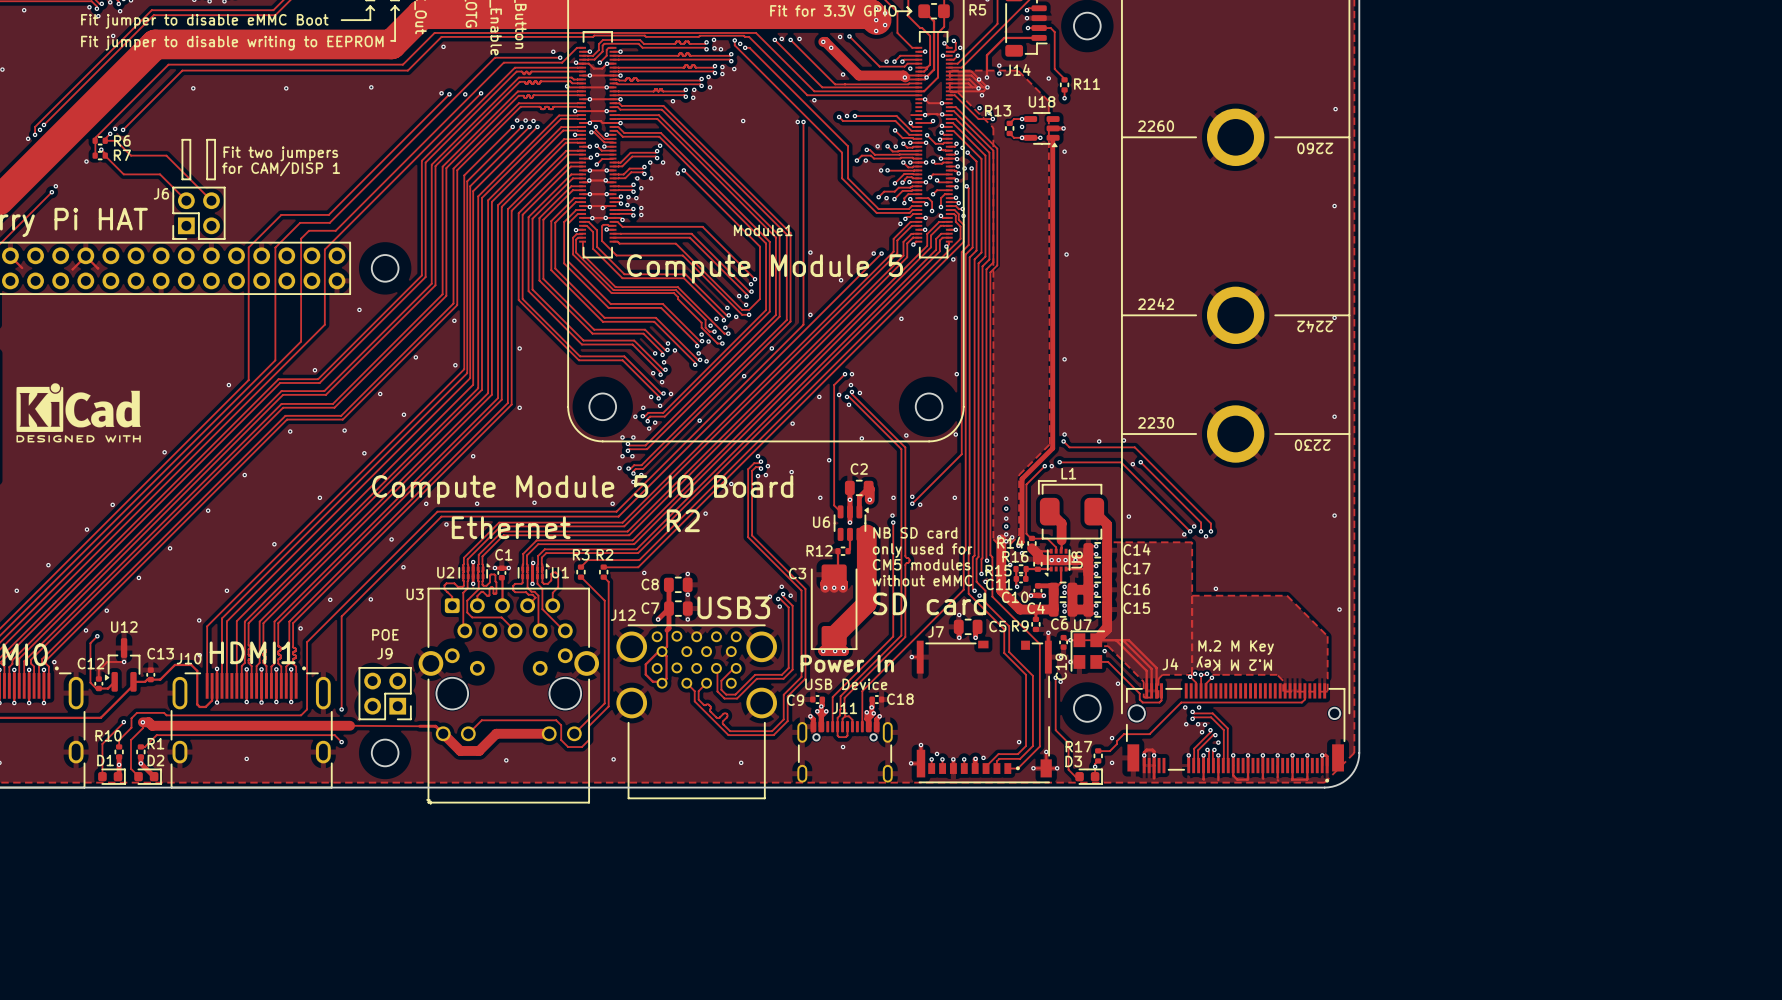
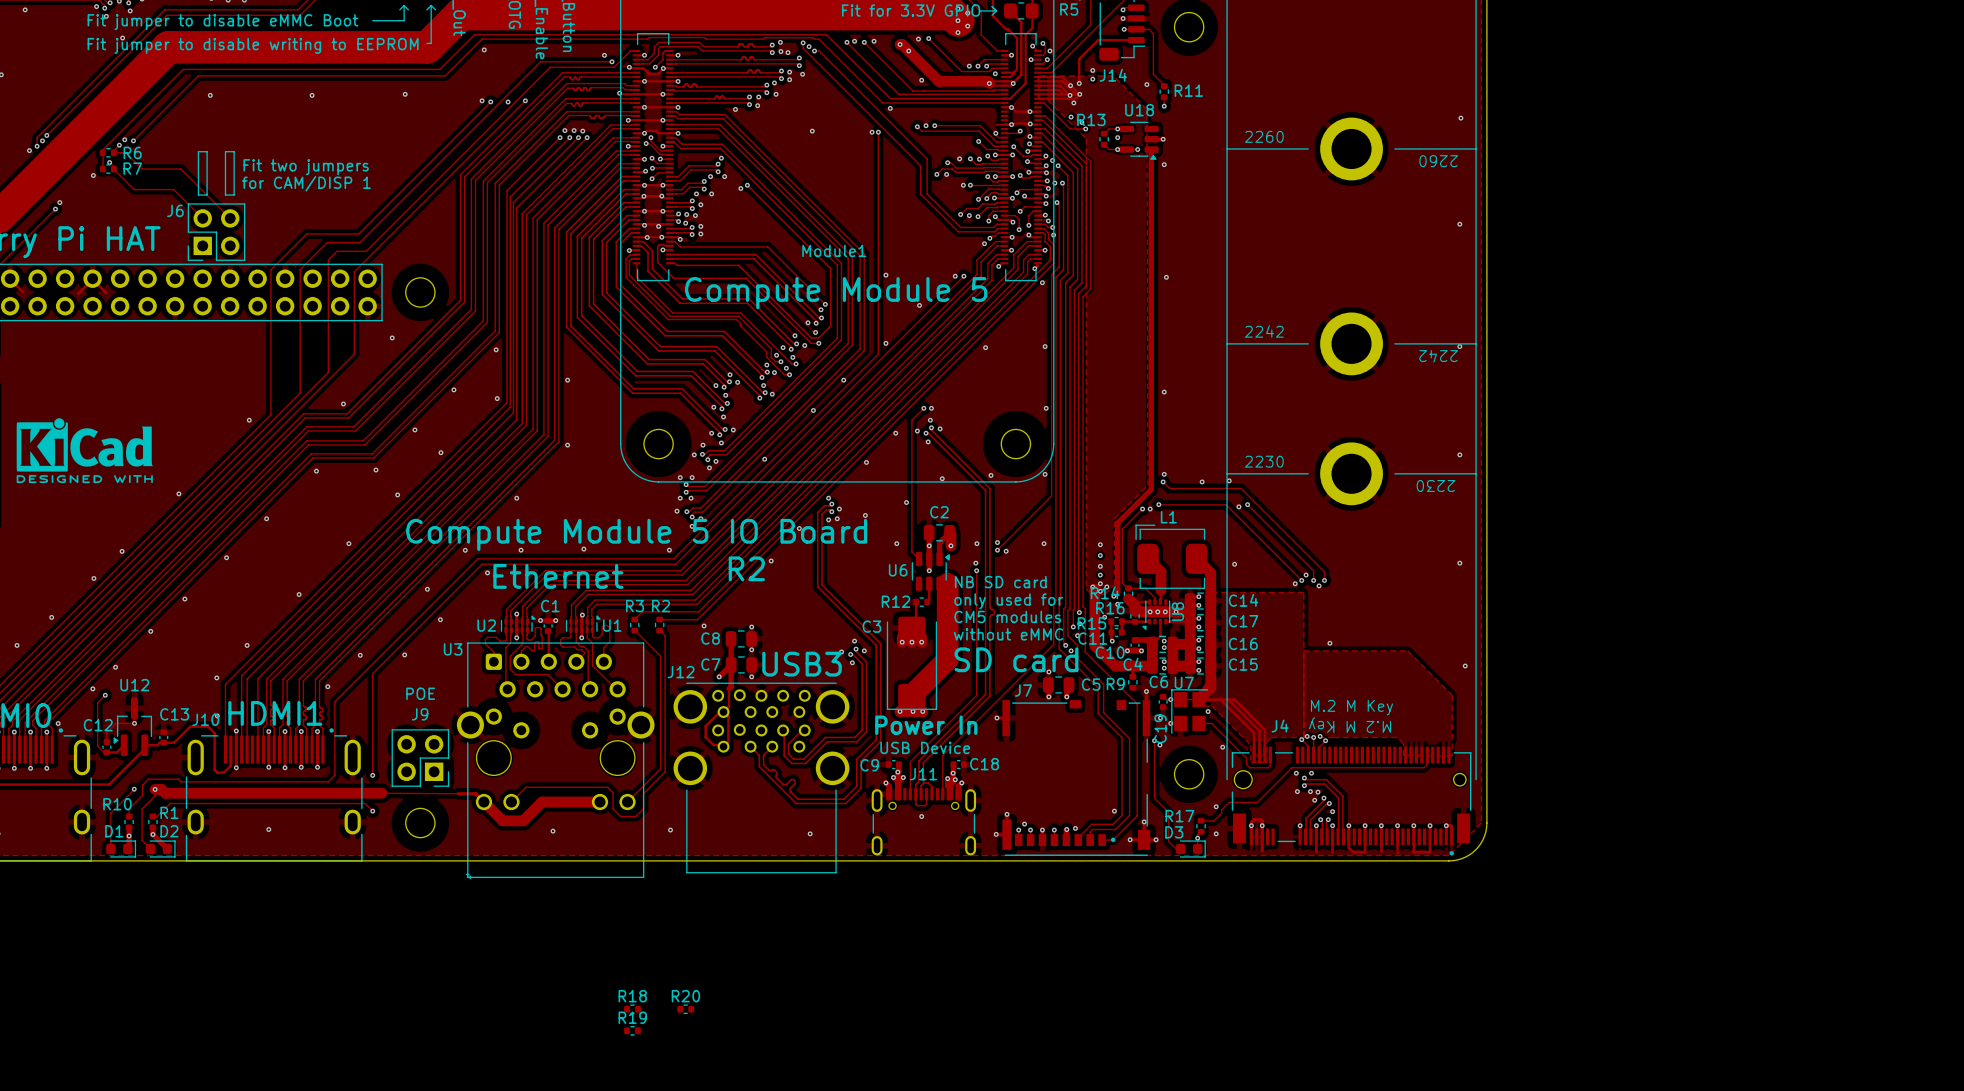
R18: none -> (632, 1009)
R20: none -> (685, 1009)
R19: none -> (632, 1030)

